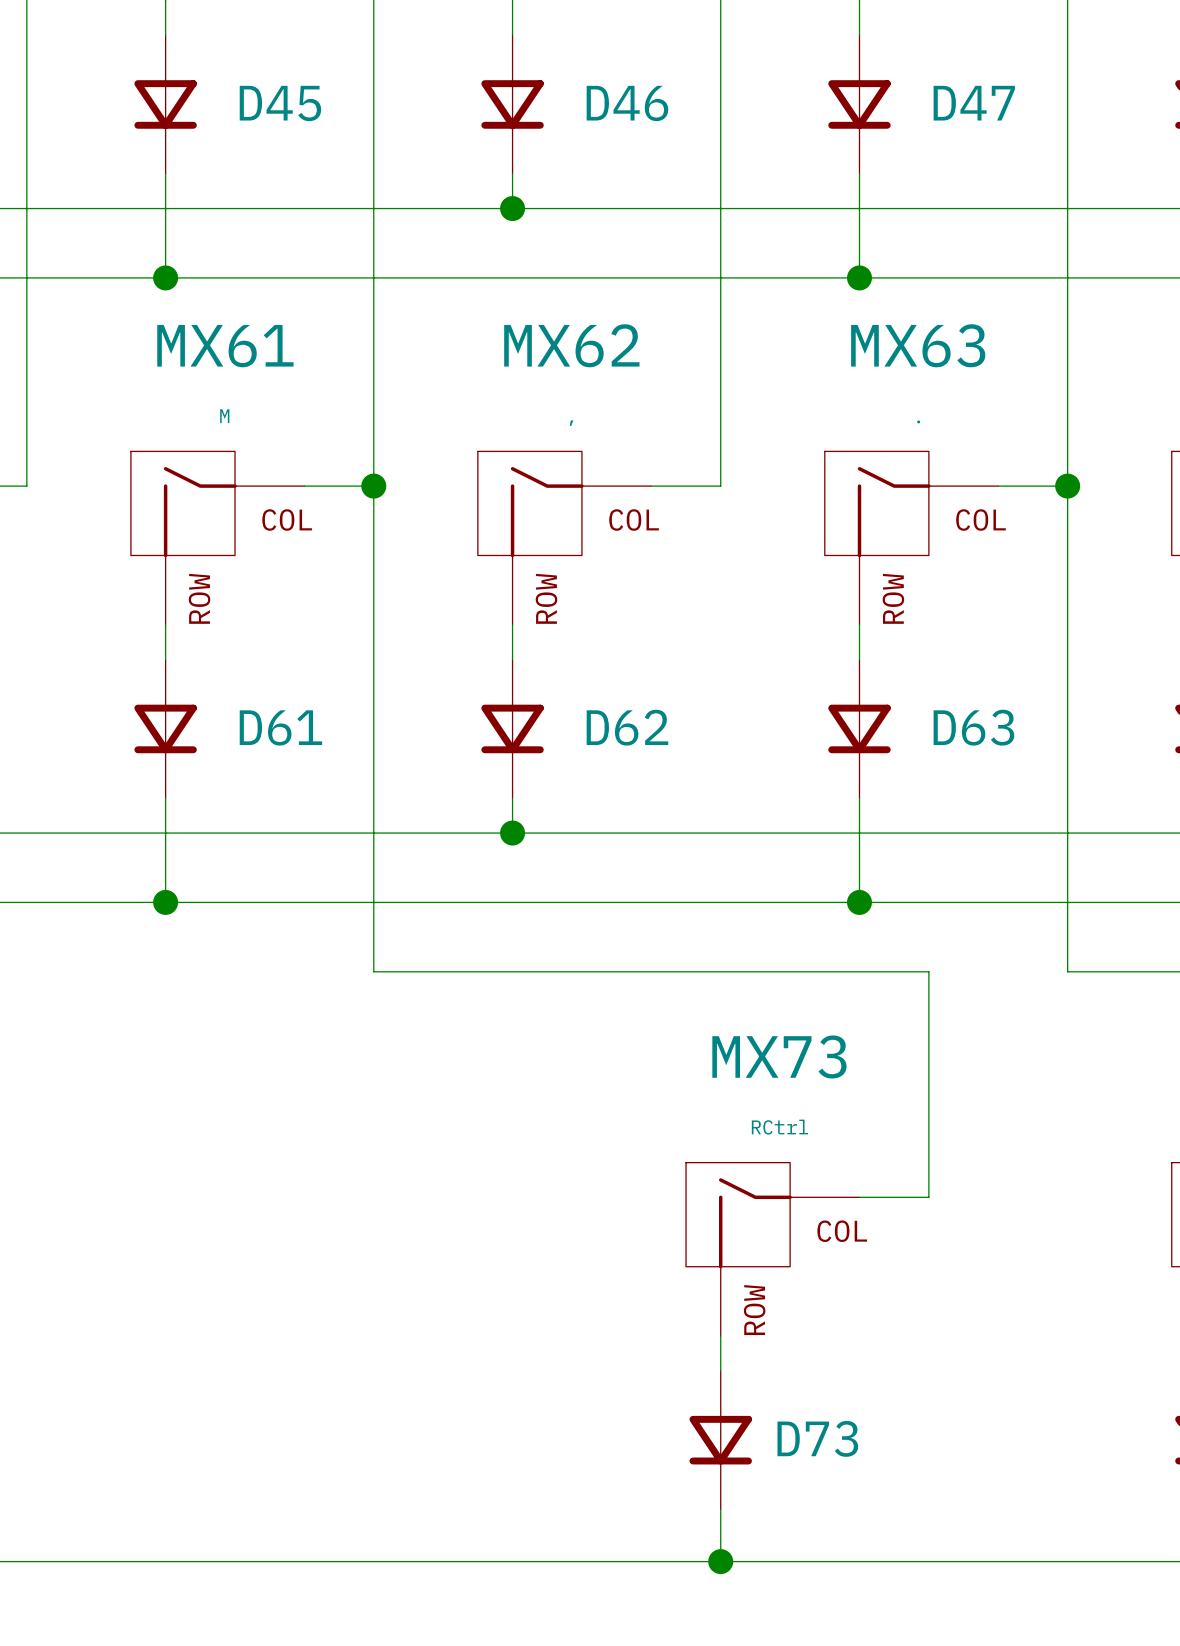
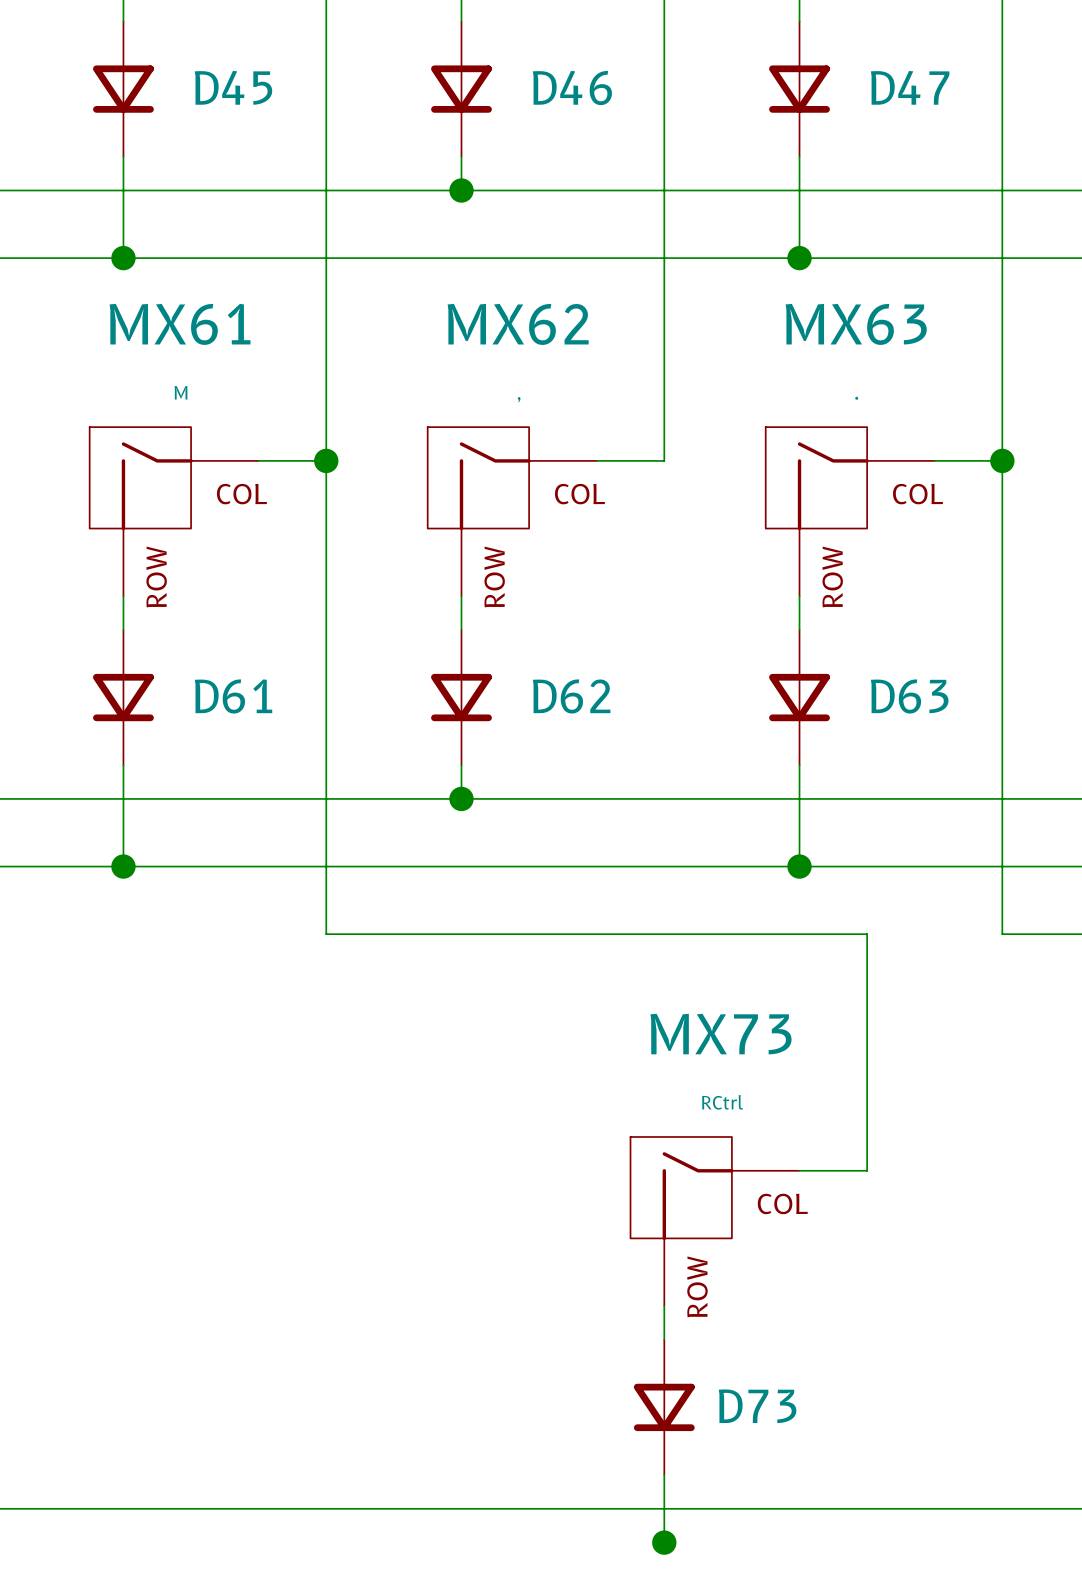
wire: (859, 1197) (928, 1197) -> (799, 1170) (867, 1170) (867, 1153)
MX73 position: (772, 1249) -> (715, 1221)
D73 position: (720, 1440) -> (664, 1407)
wire: none -> (664, 1508) (664, 1542)
junction position: (720, 1561) -> (664, 1542)

